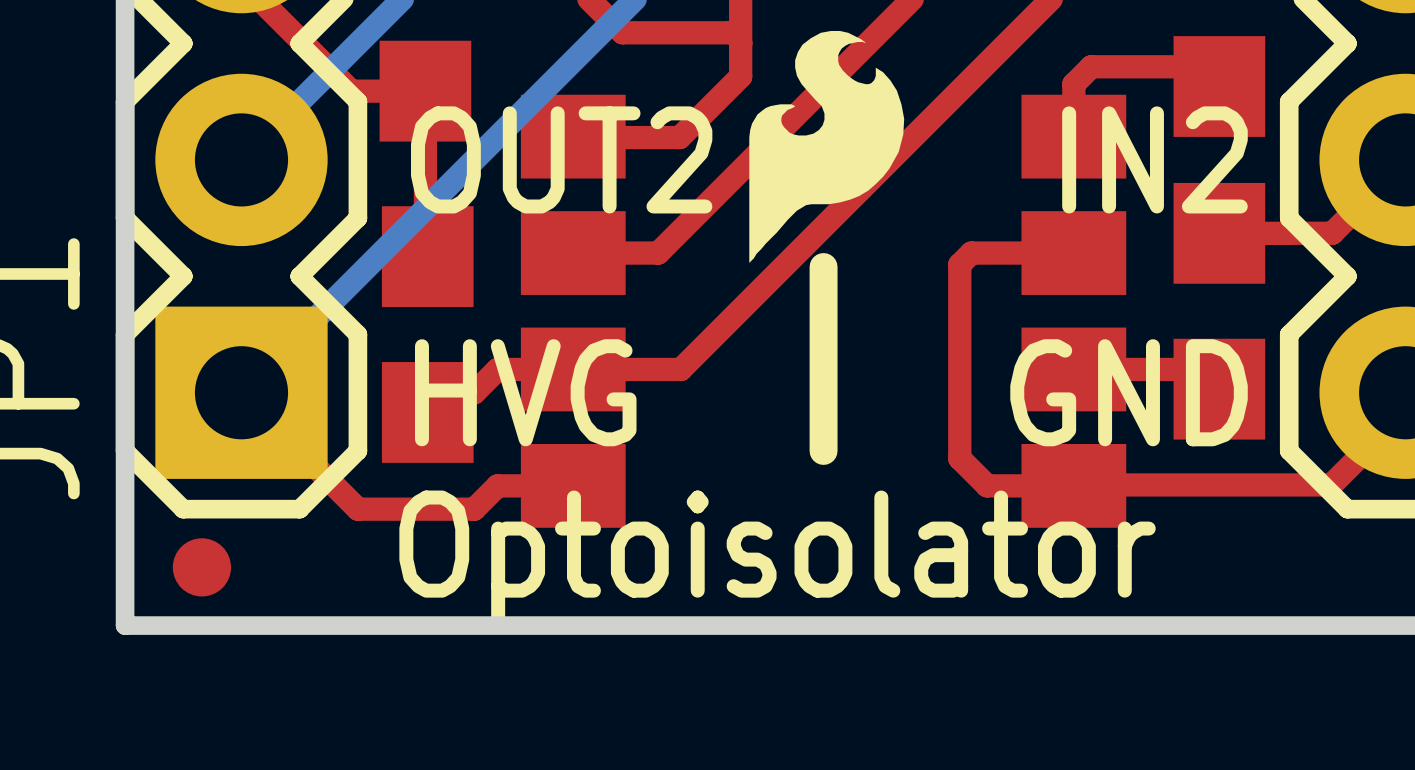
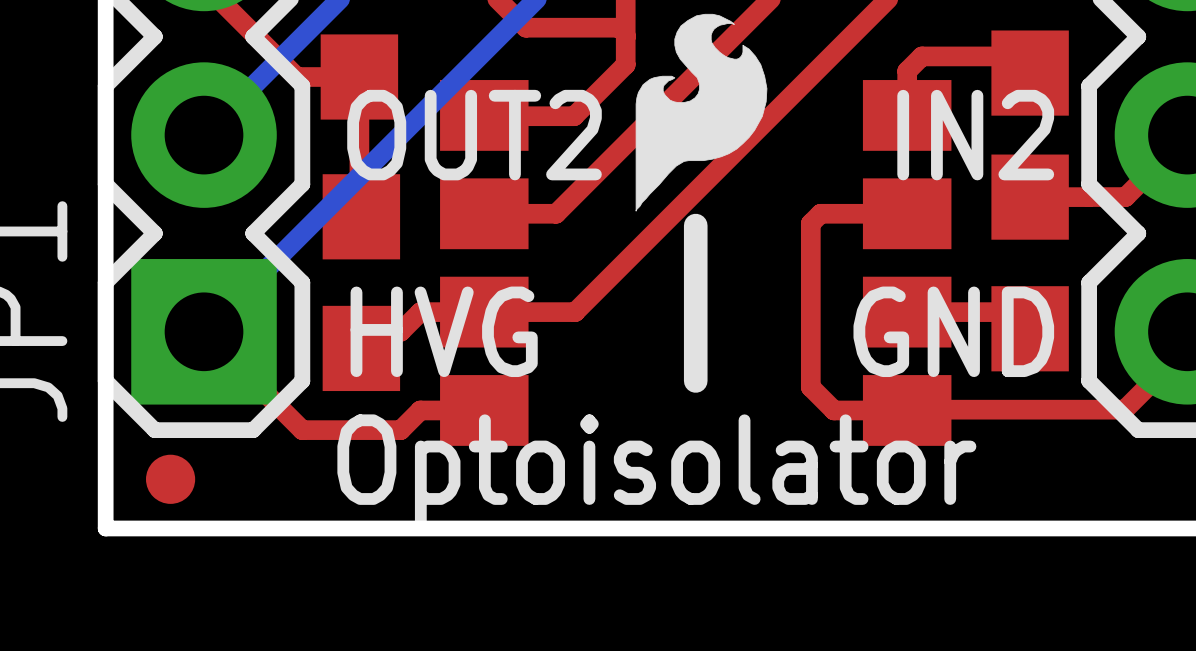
drawing shape: [749, 30, 905, 264] -> [635, 13, 768, 212]

